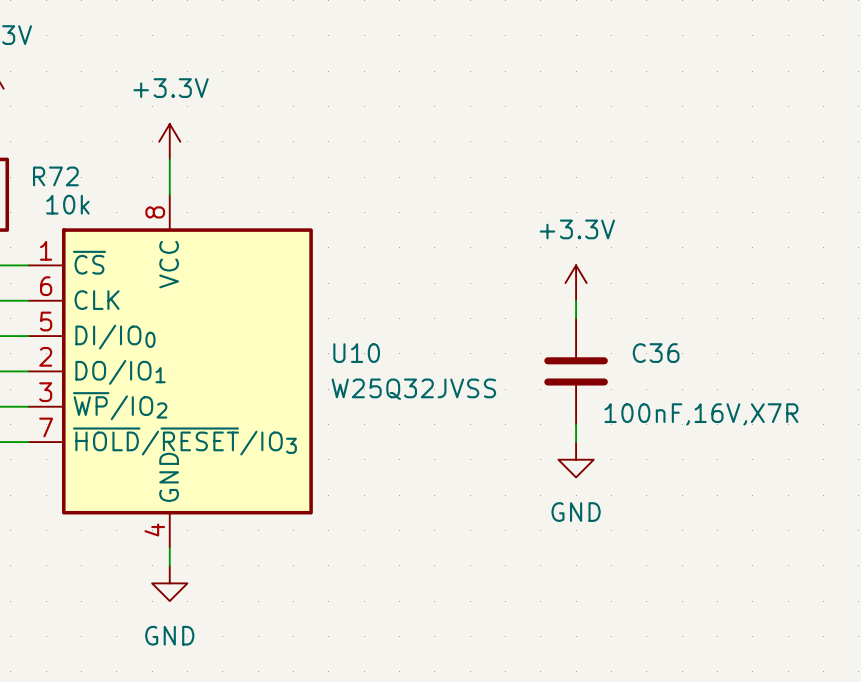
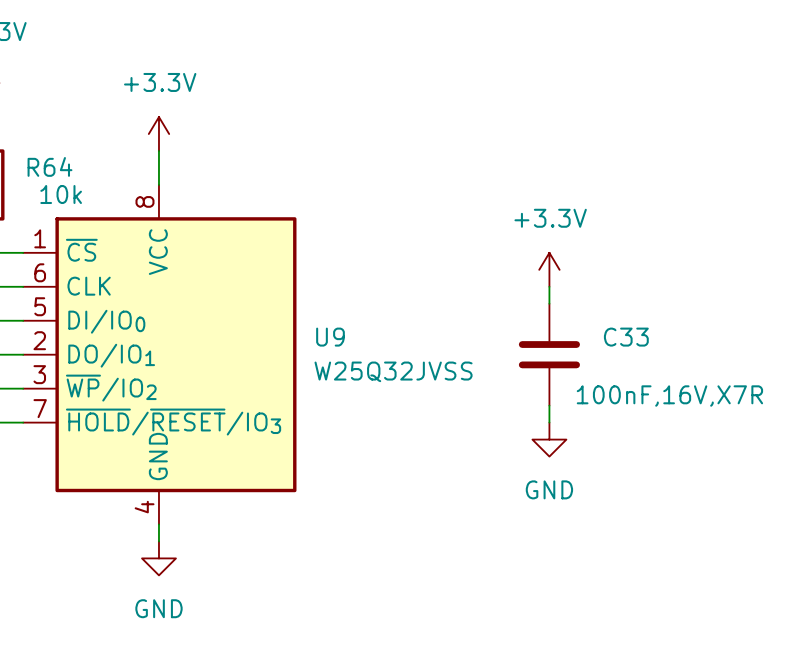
R72 name: R72 (55, 176) -> R64 (49, 166)
U10 name: U10 (356, 353) -> U9 (330, 337)
C36 name: C36 (656, 353) -> C33 (626, 337)

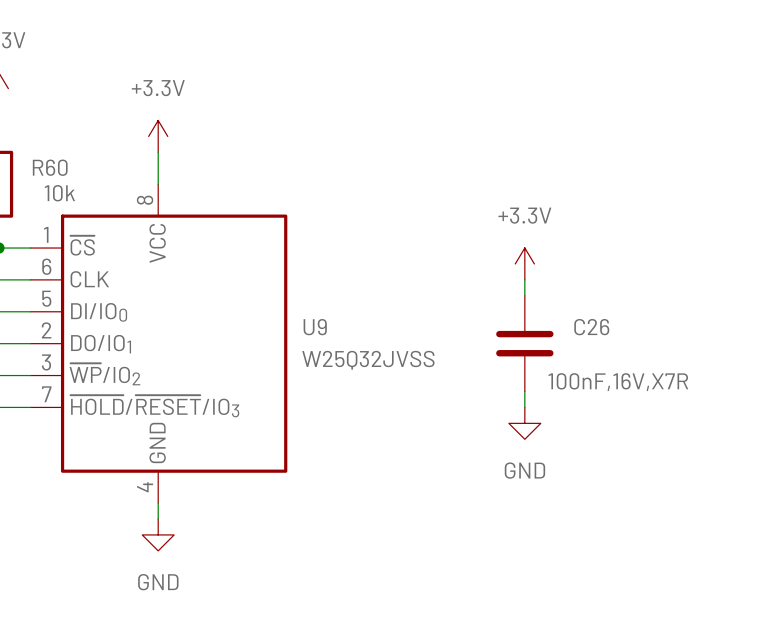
R64 name: R64 (49, 166) -> R60 (50, 167)
C33 name: C33 (626, 337) -> C26 (591, 327)

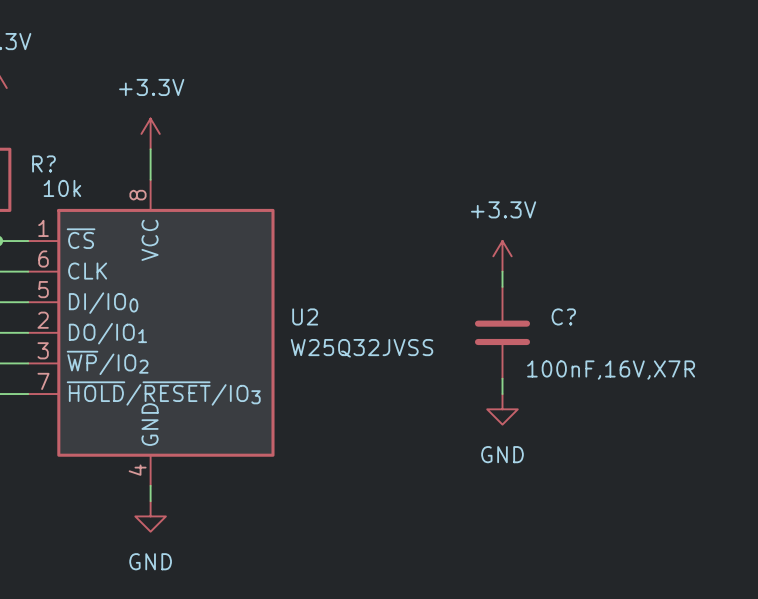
R60 name: R60 (50, 167) -> R? (43, 163)
U9 name: U9 (315, 327) -> U2 (305, 316)
C26 name: C26 (591, 327) -> C? (563, 316)

